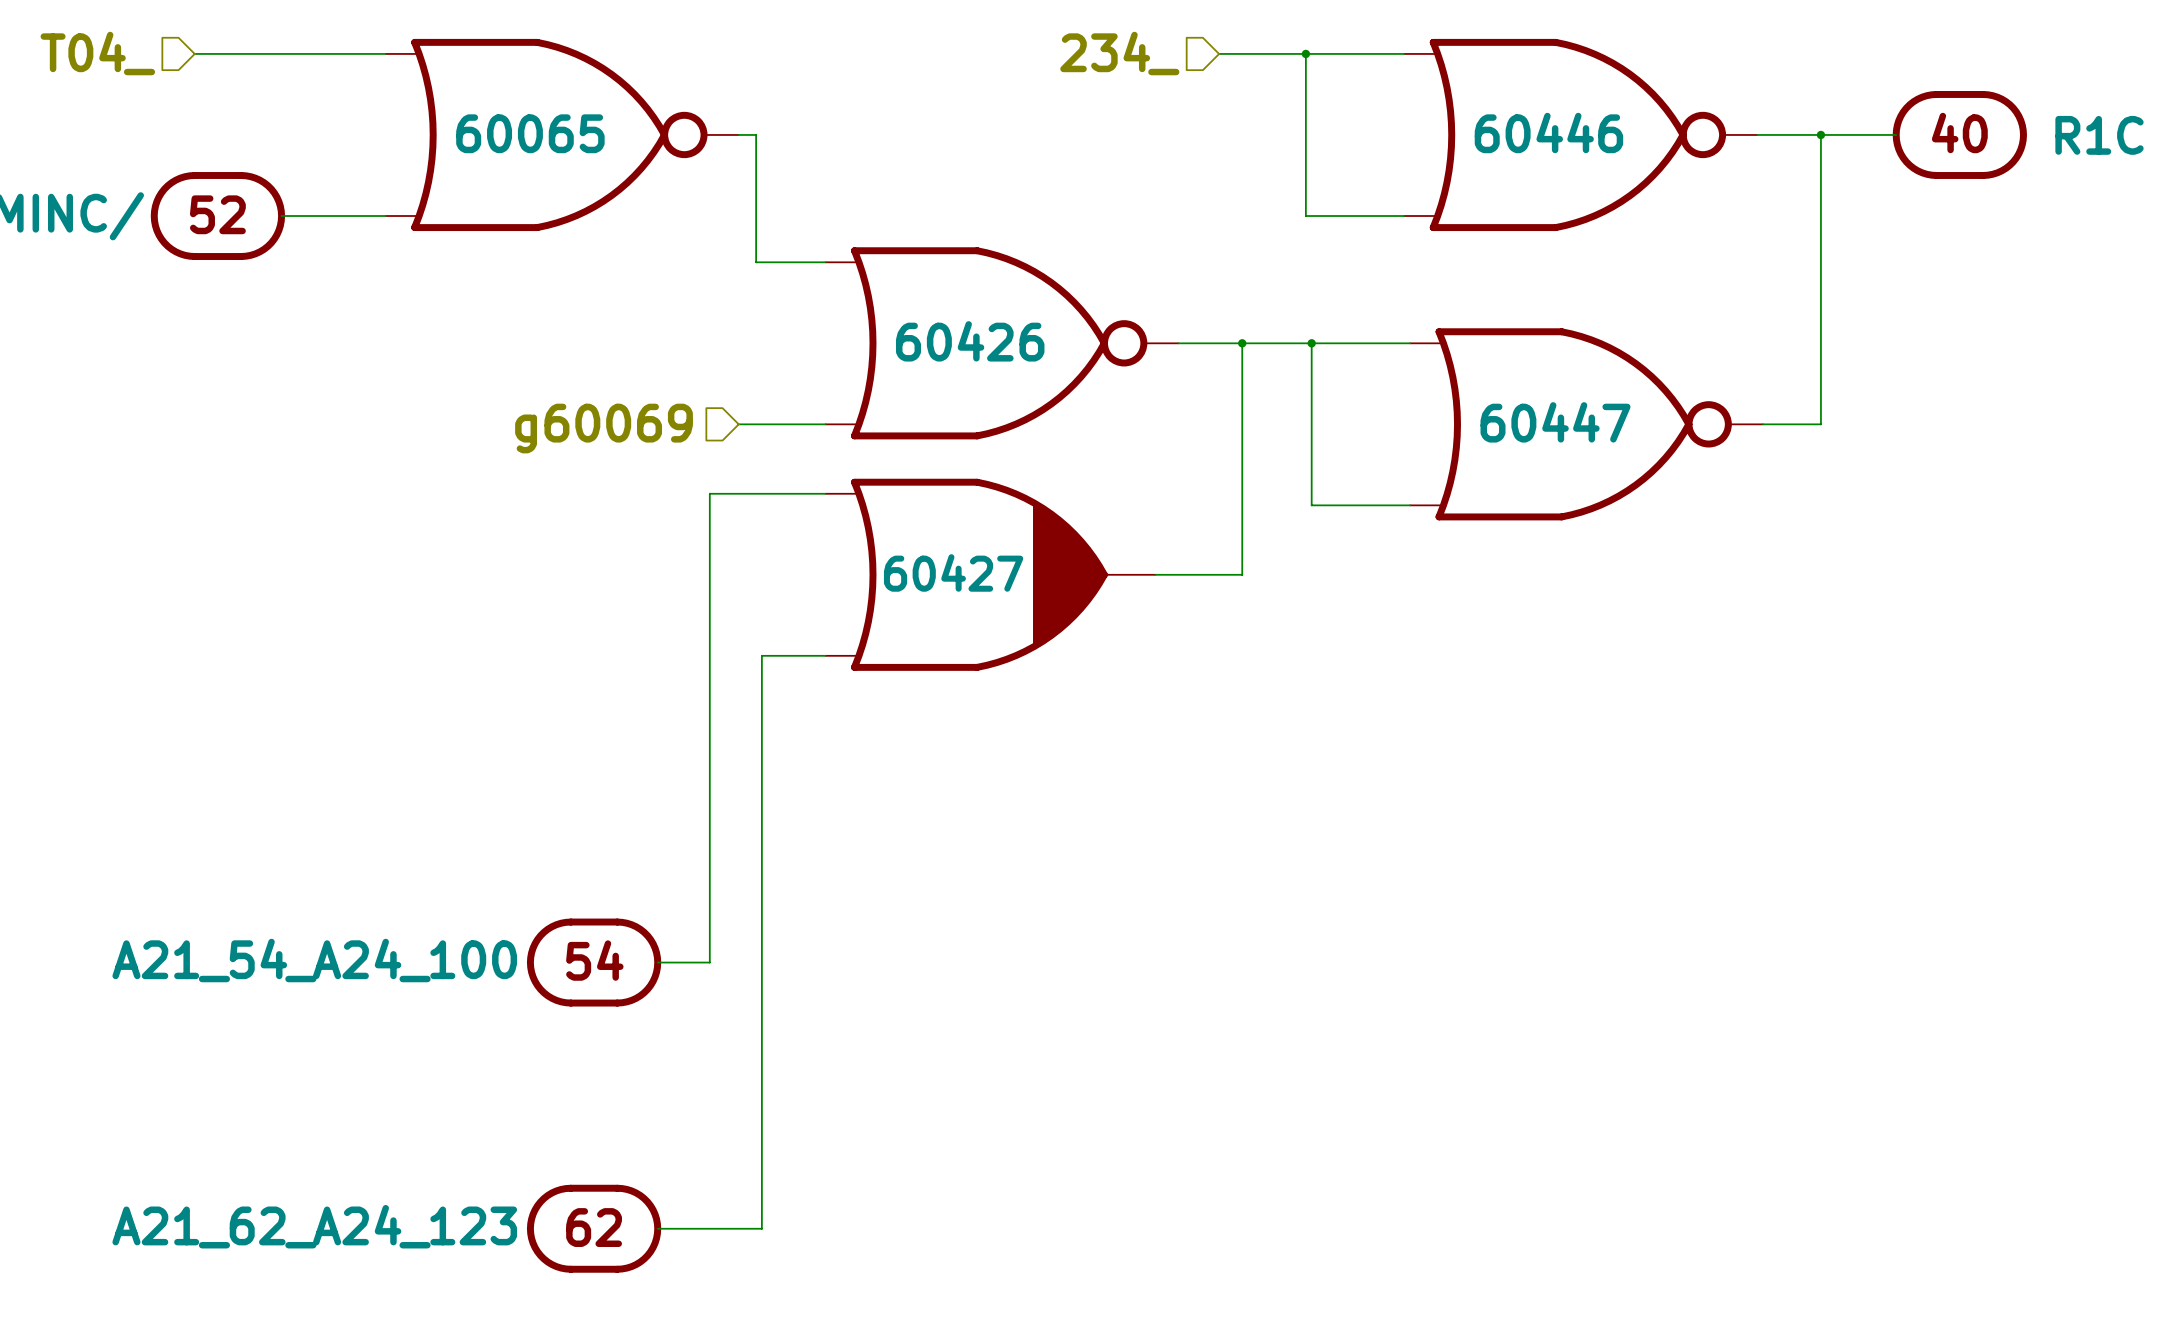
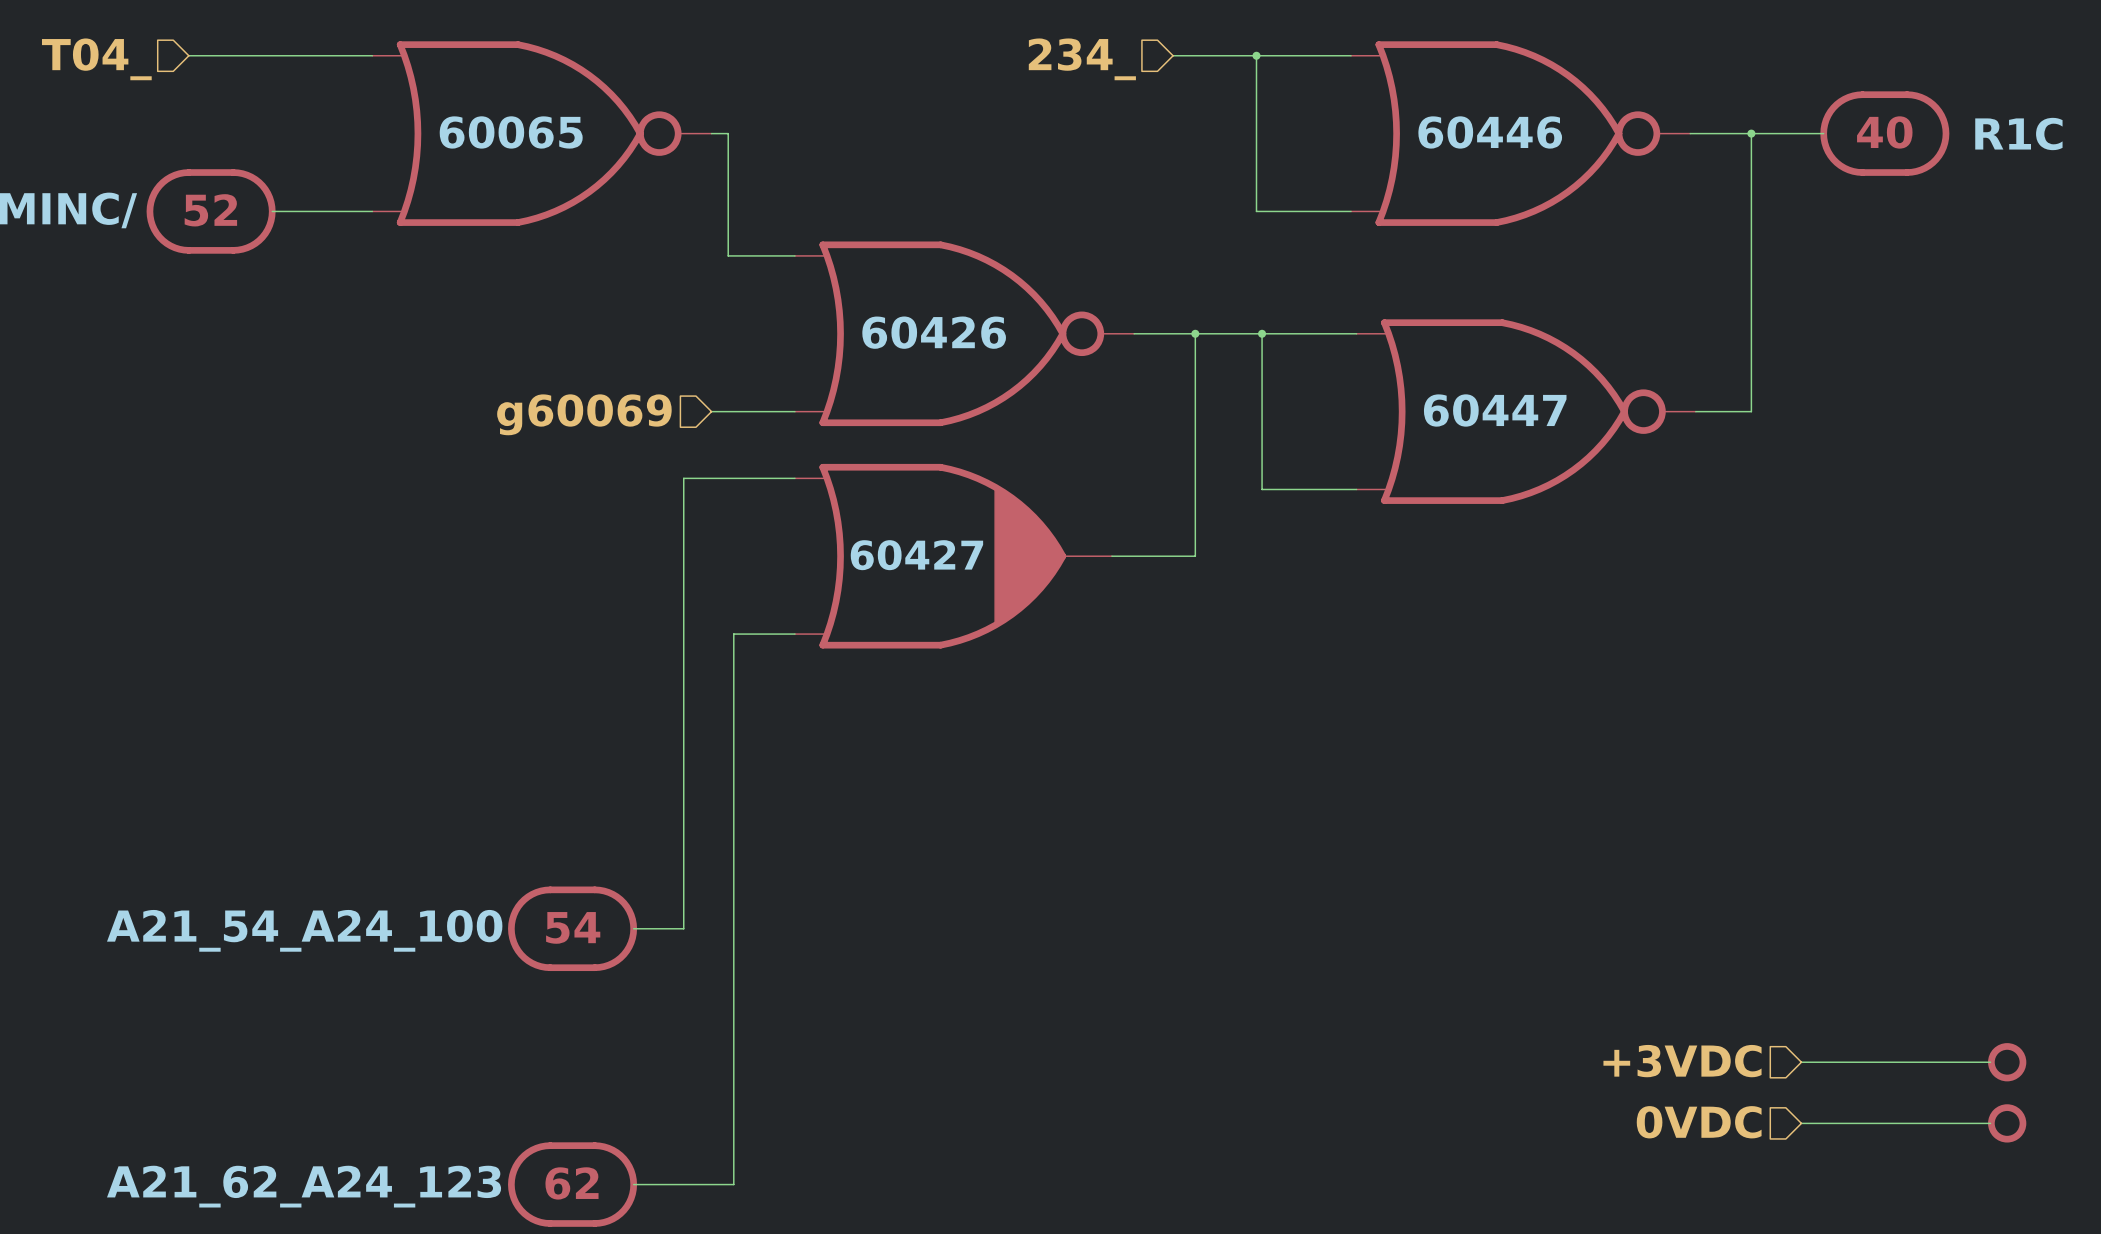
hierarchical label: none -> +3VDC (1682, 1061)
wire: none -> (1801, 1062) (1990, 1062)
part: none -> (2007, 1062)
hierarchical label: none -> 0VDC (1699, 1122)
wire: none -> (1801, 1123) (1990, 1123)
part: none -> (2007, 1123)

